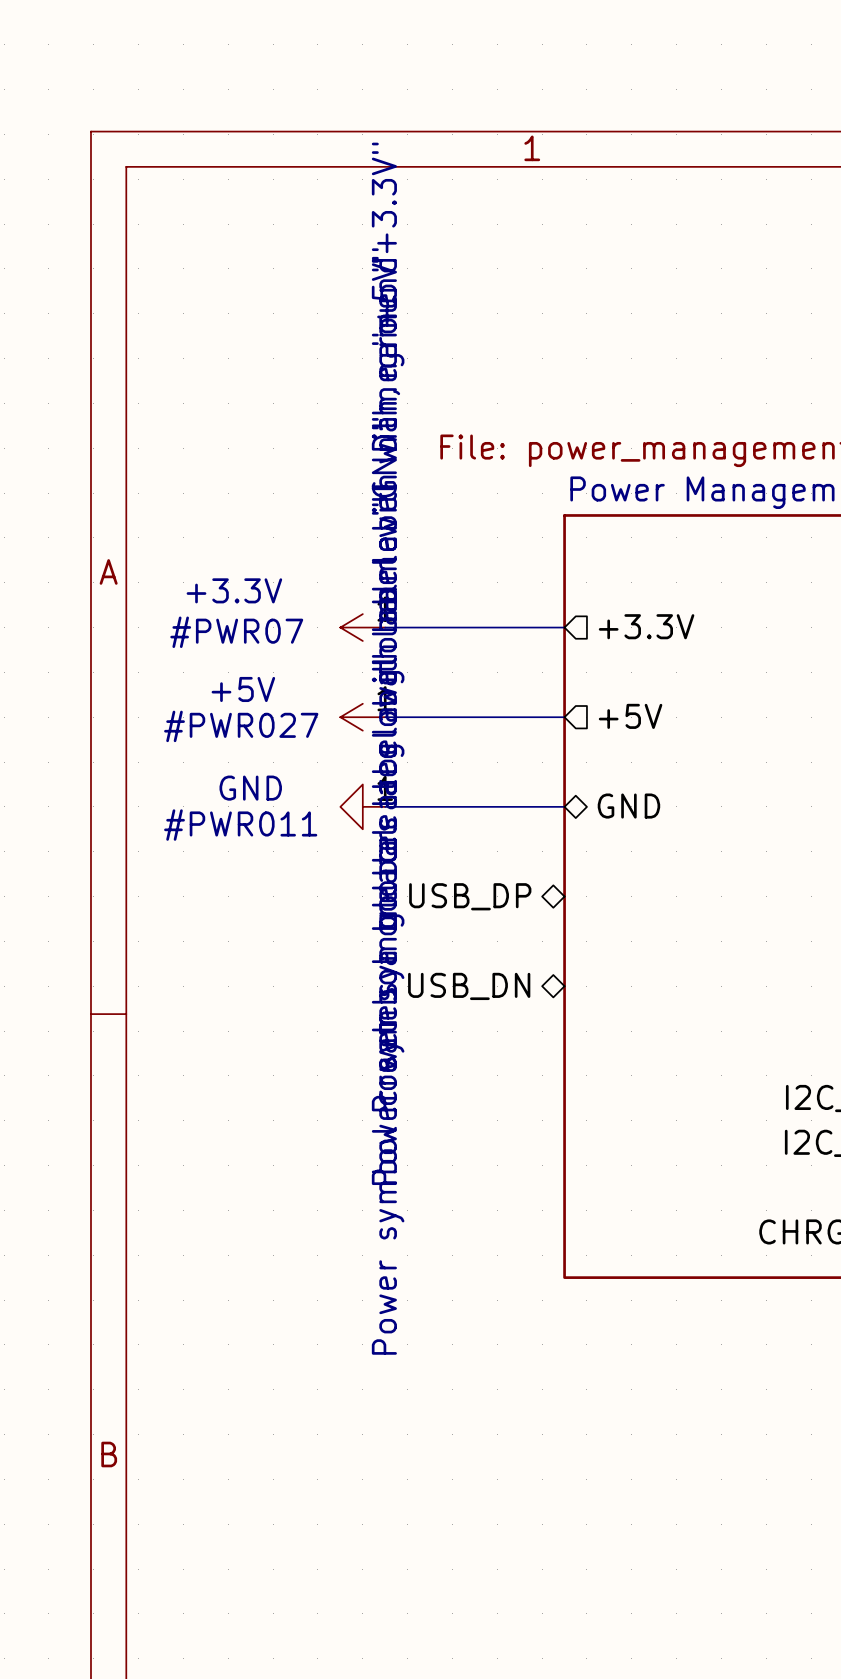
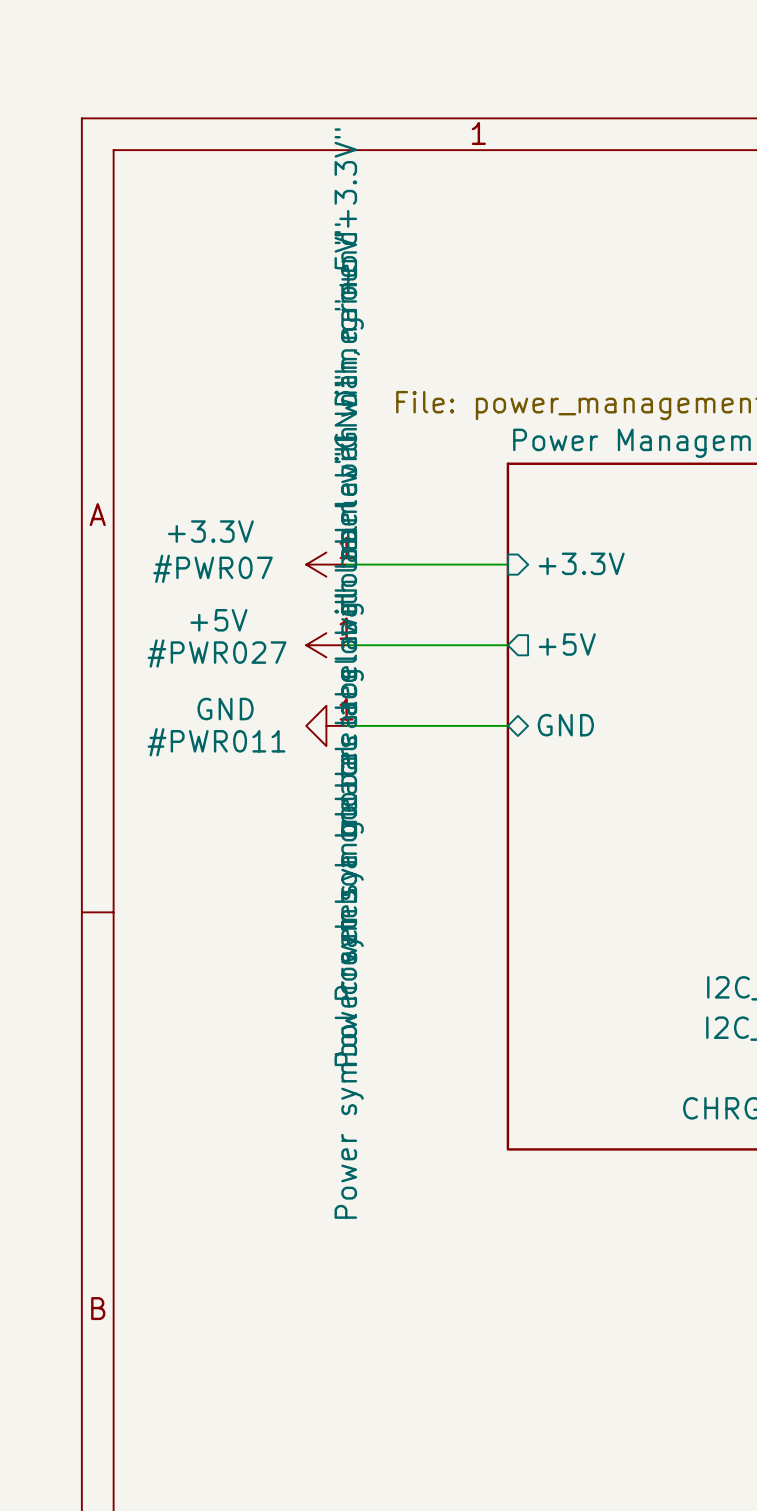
sheet pin shape: output (646, 626) -> input (581, 563)
sheet pin: USB_DP (470, 896) -> none
sheet pin: USB_DN (469, 986) -> none

